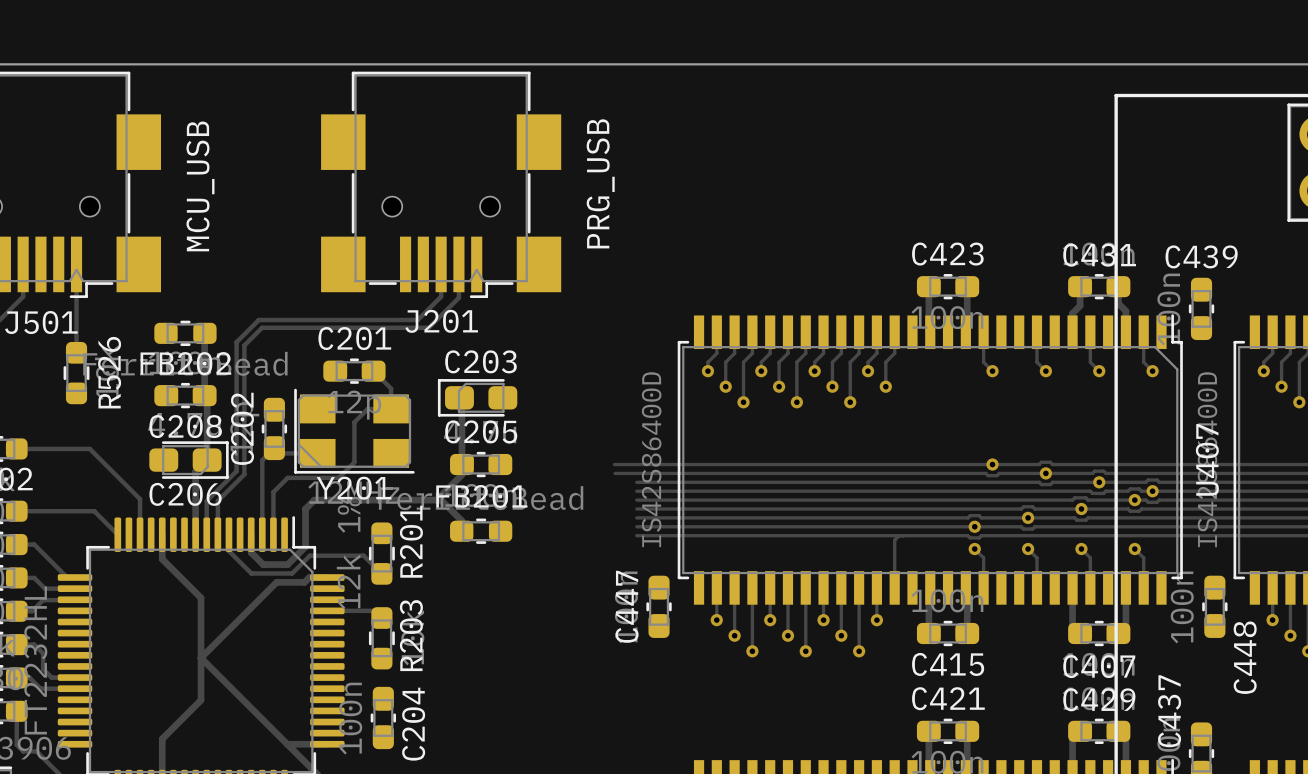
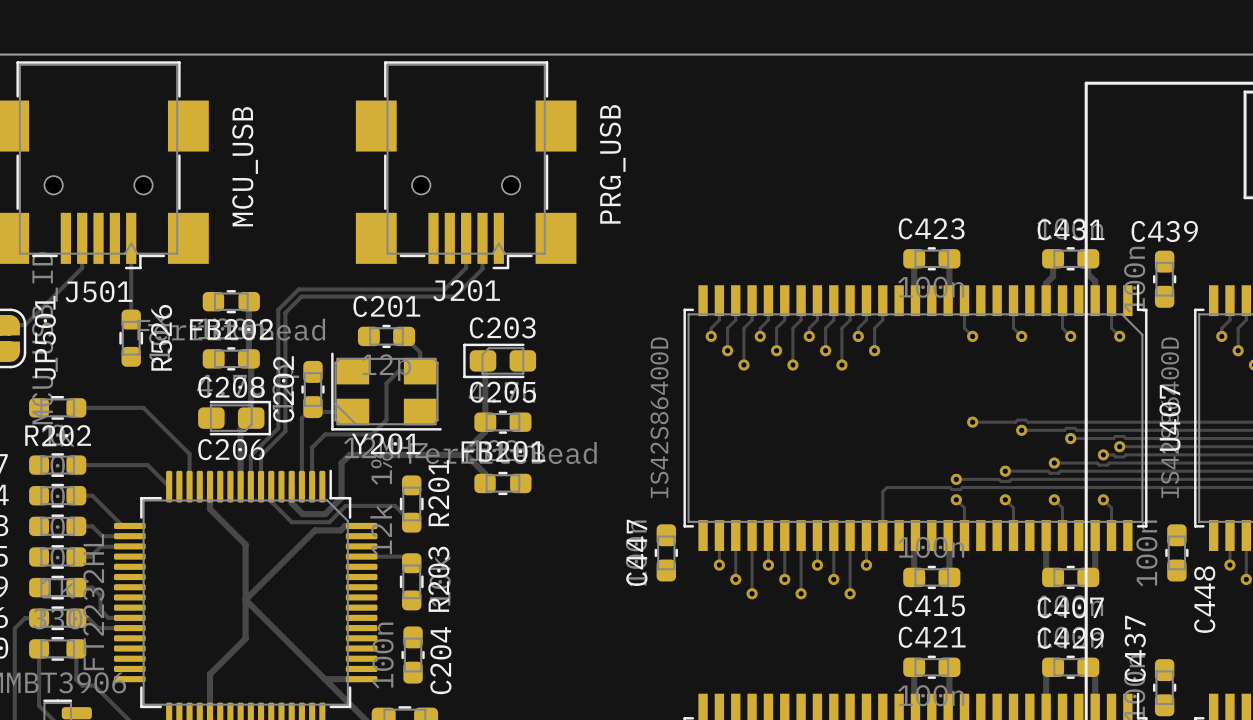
track: (614, 464) (992, 464) -> none
track: (615, 473) (985, 473) (988, 475) (996, 475) (999, 473) (1045, 473) -> none
track: (636, 482) (1039, 482) (1041, 484) (1050, 484) (1052, 482) (1099, 482) -> none
track: (636, 491) (1090, 491) (1092, 493) (1103, 493) (1105, 491) (1128, 491) (1130, 488) (1152, 491) -> none
track: (636, 500) (1072, 500) (1074, 497) (1085, 497) (1088, 500) (1134, 500) -> none
track: (636, 508) (1021, 508) (1023, 506) (1032, 506) (1034, 508) (1081, 508) -> none
track: (636, 517) (968, 517) (970, 515) (979, 515) (981, 517) (1028, 517) -> none
track: (636, 526) (974, 526) -> none
track: (636, 535) (899, 535) -> none

